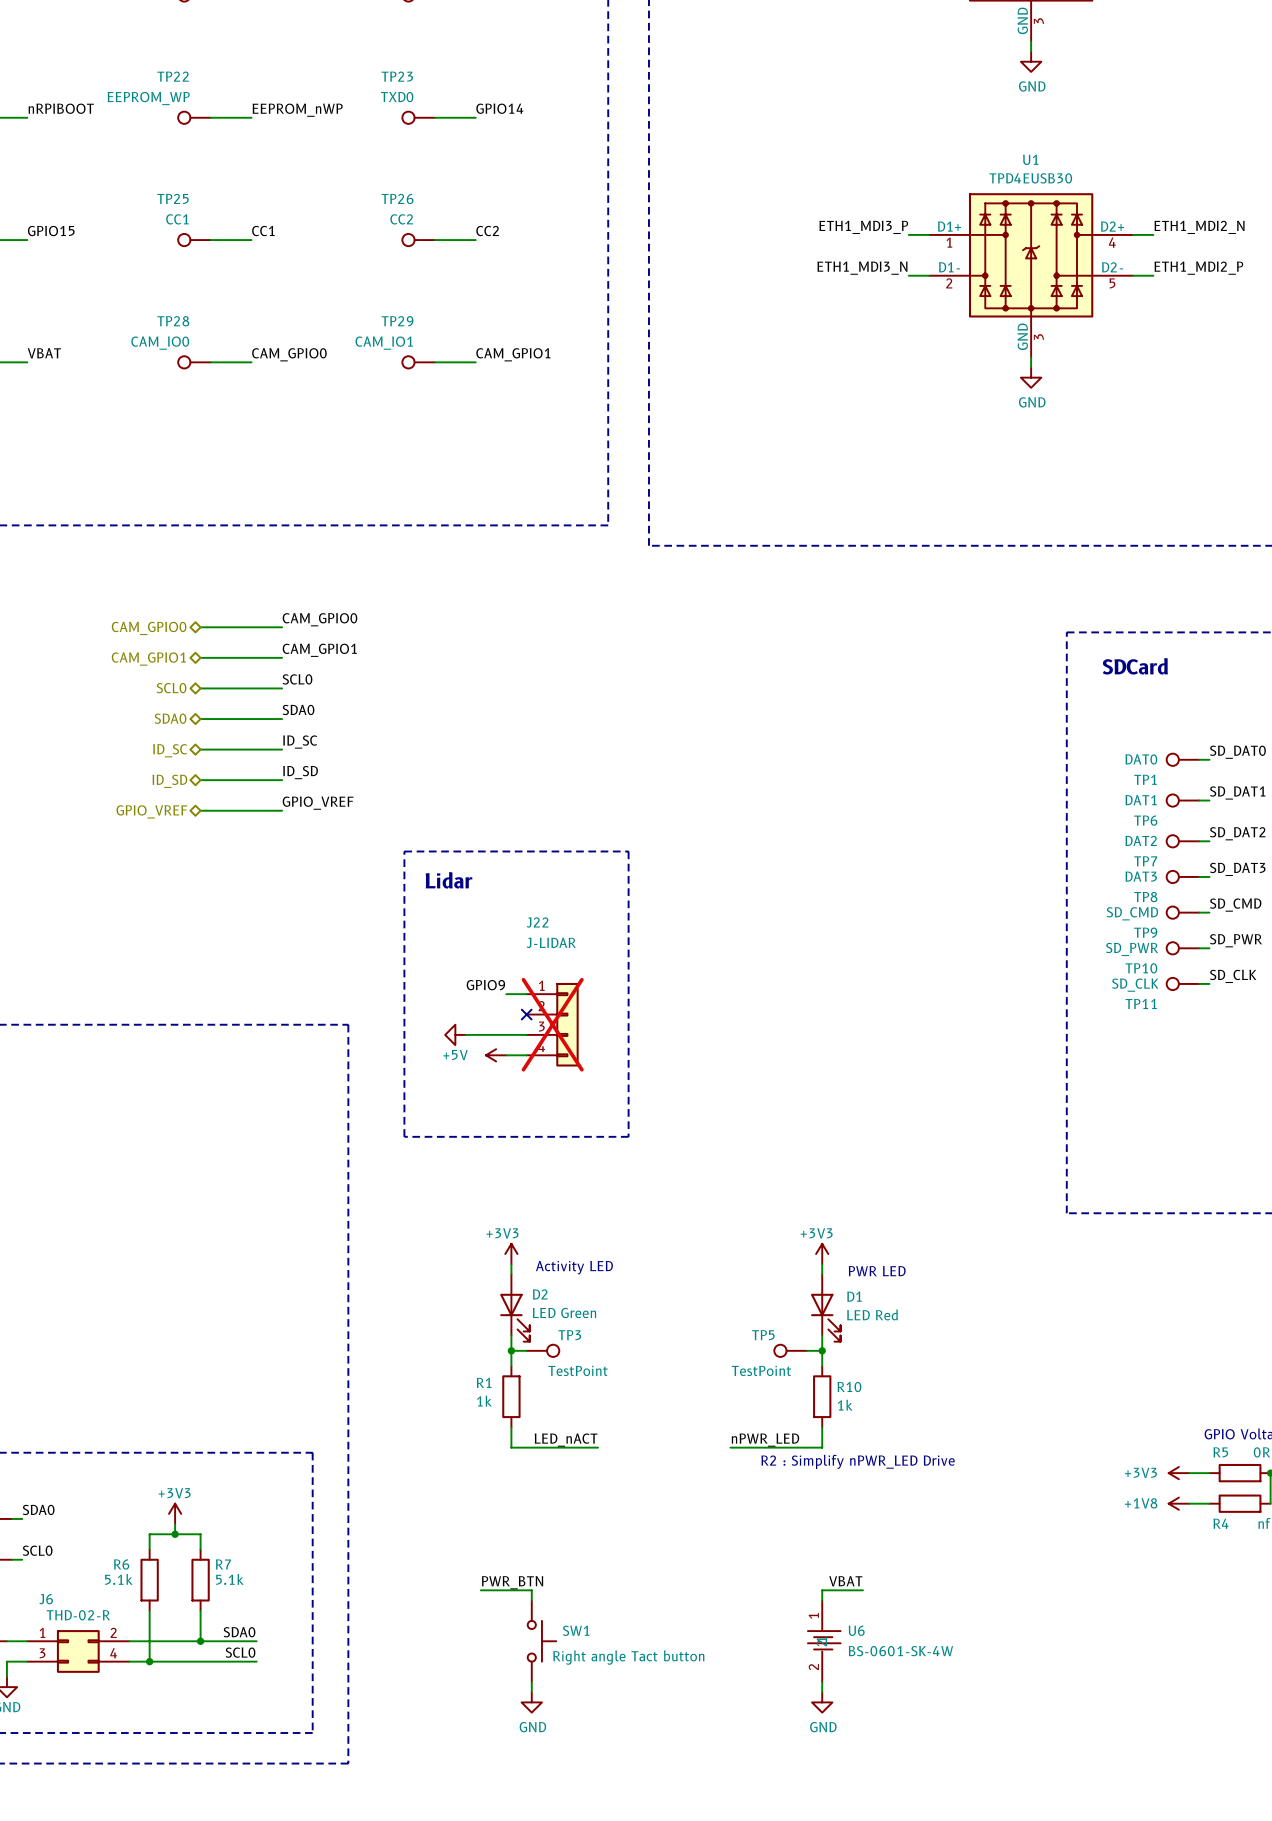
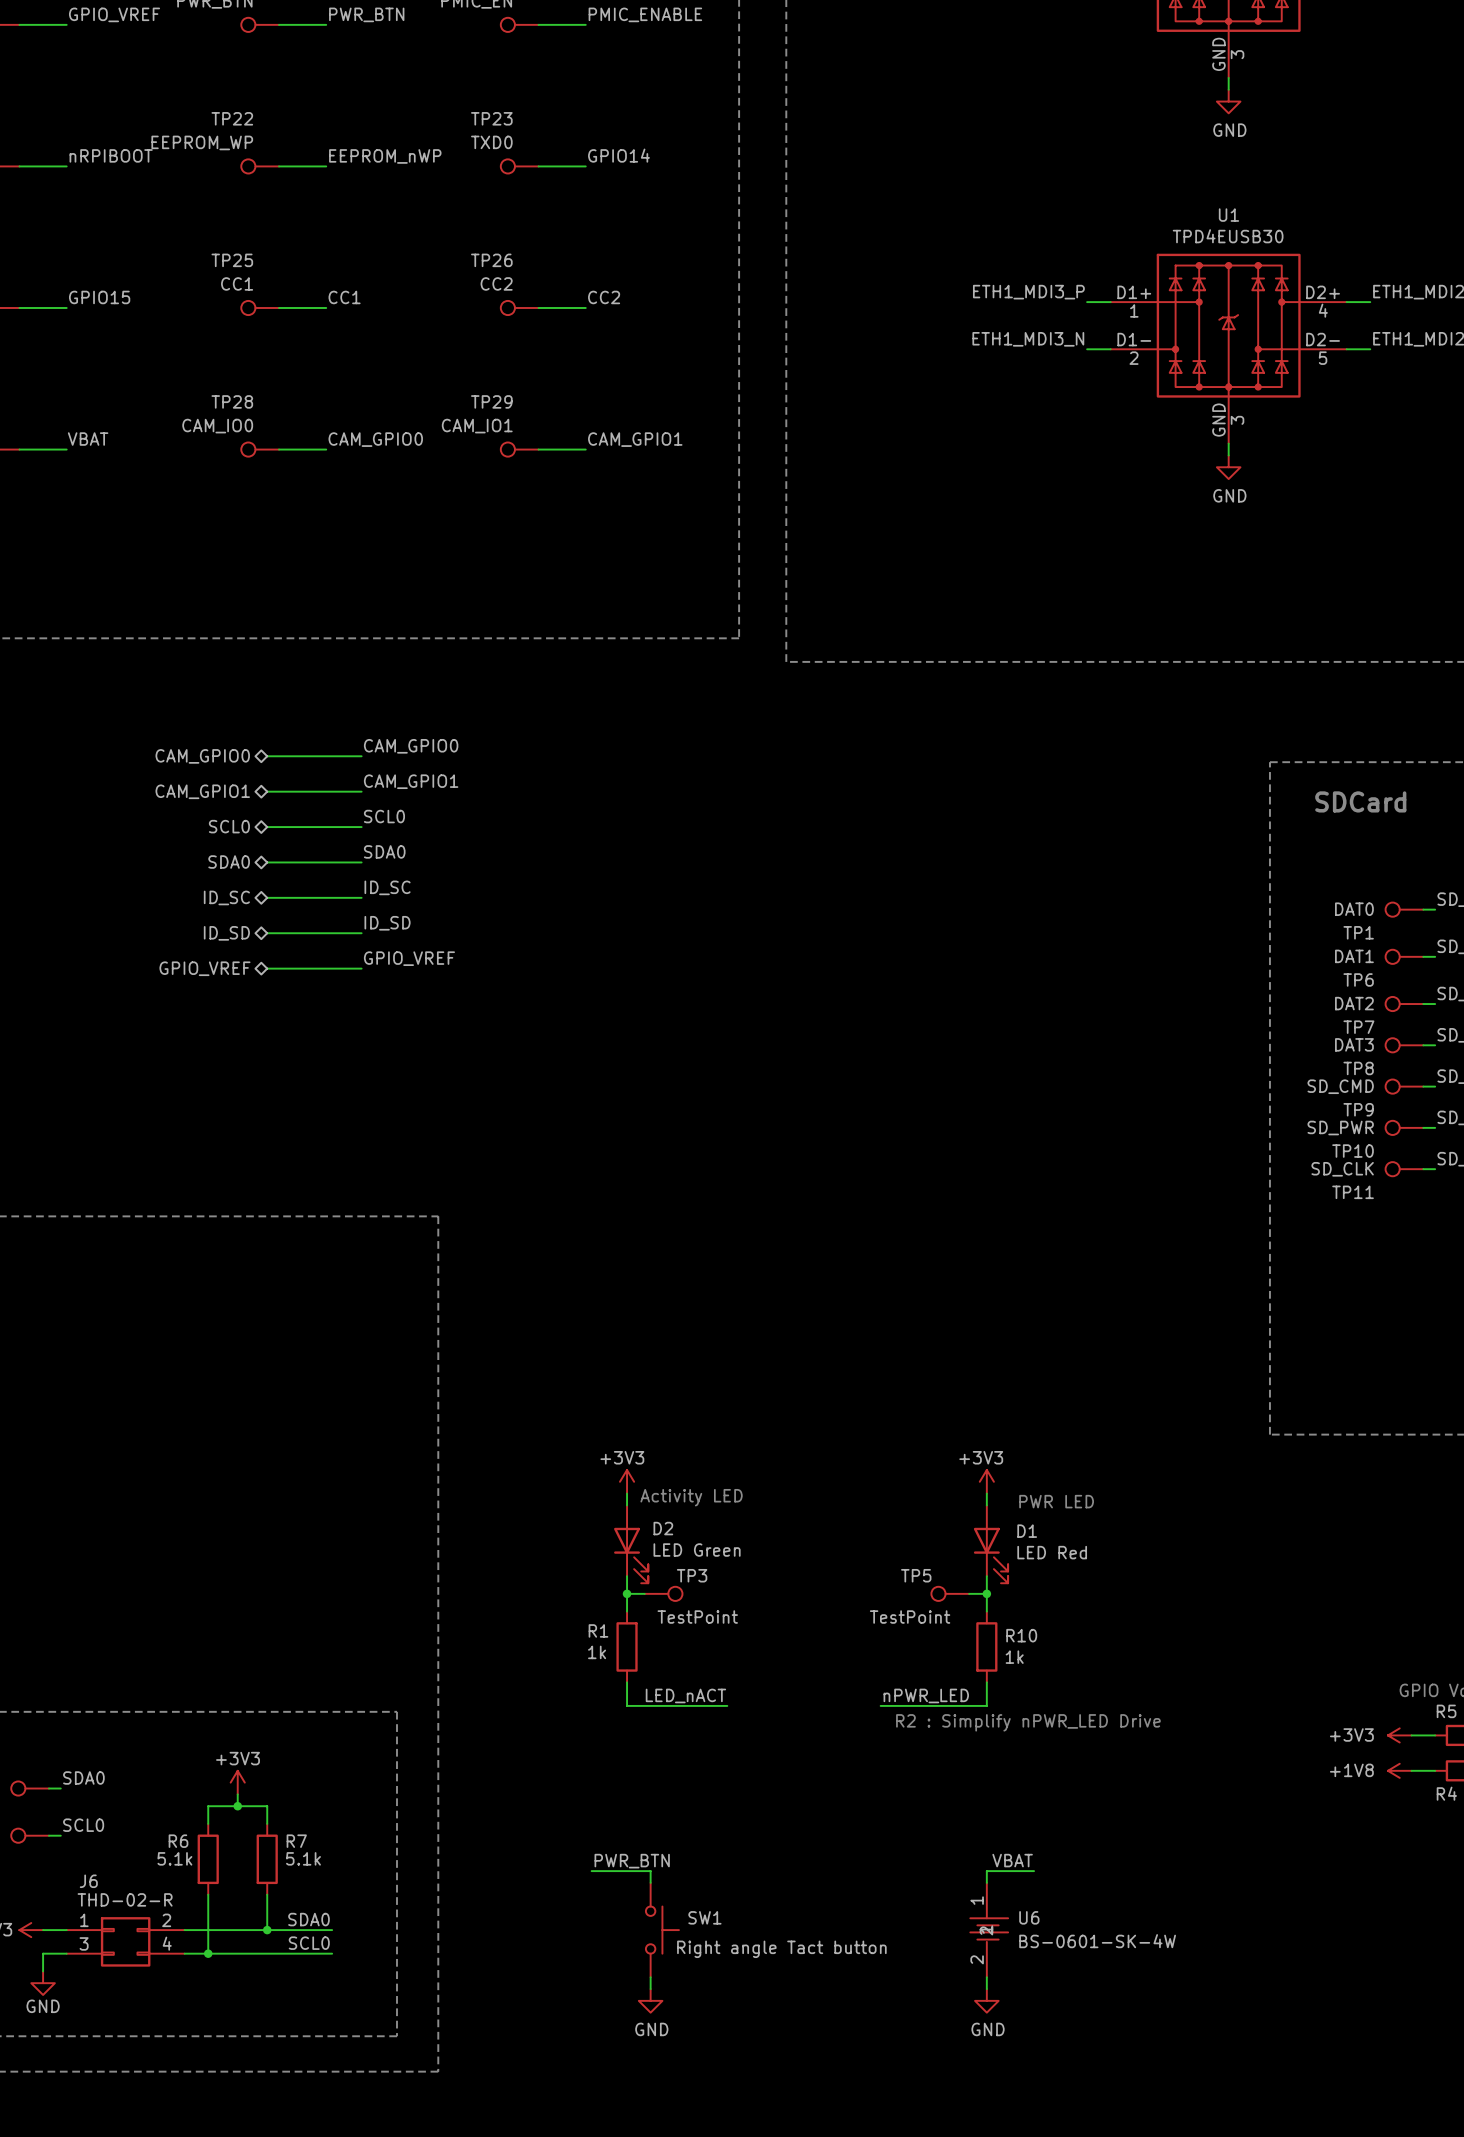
line: (404, 851) (628, 851) (628, 1136) (404, 1136) (404, 851) -> none
text: Lidar (449, 880) -> none
label: GPIO9 (485, 985) -> none
wire: (506, 994) (526, 994) -> none
no-connect mark: (526, 1014) -> none
J22: J-LIDAR (552, 1024) -> none
power symbol: (455, 1034) -> none
wire: (465, 1034) (526, 1034) -> none
power symbol: +5V (496, 1055) -> none
wire: (506, 1055) (526, 1055) -> none

